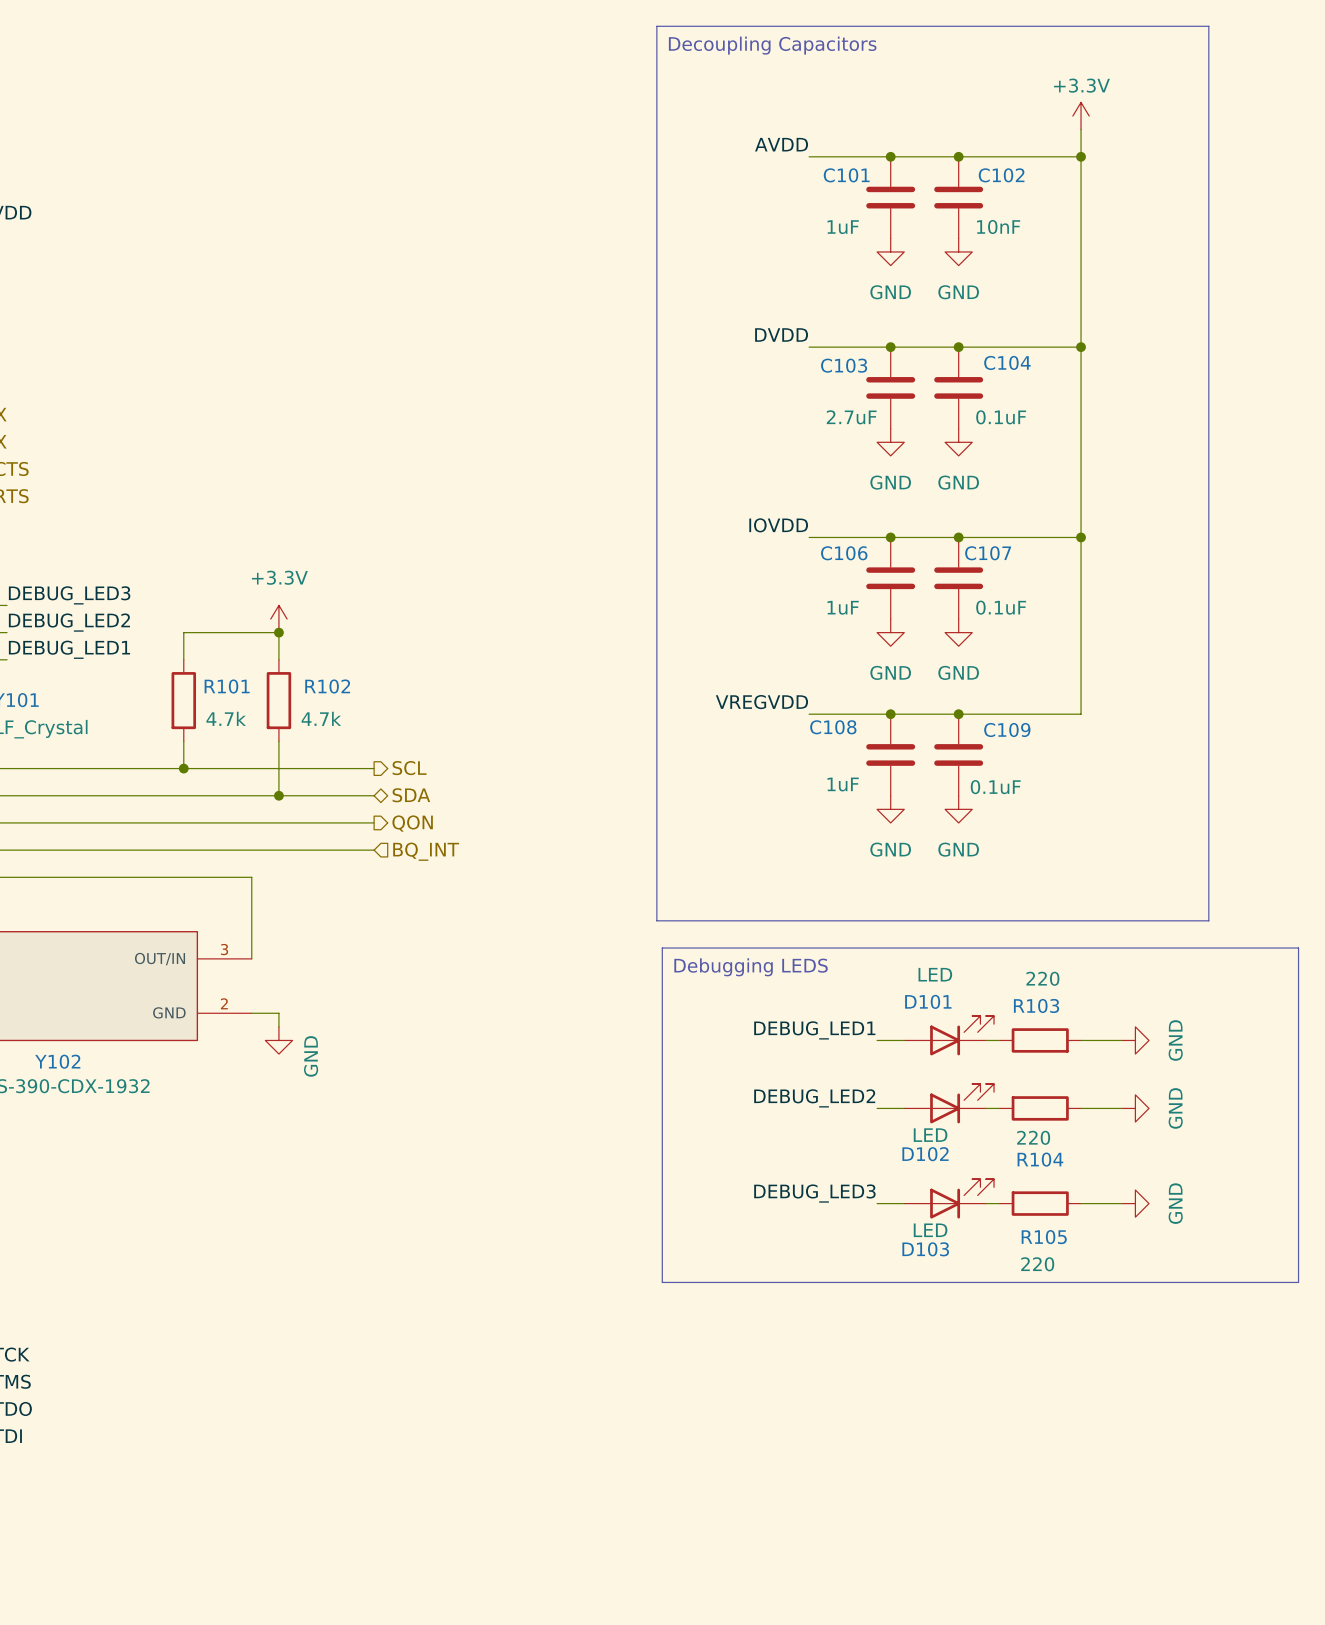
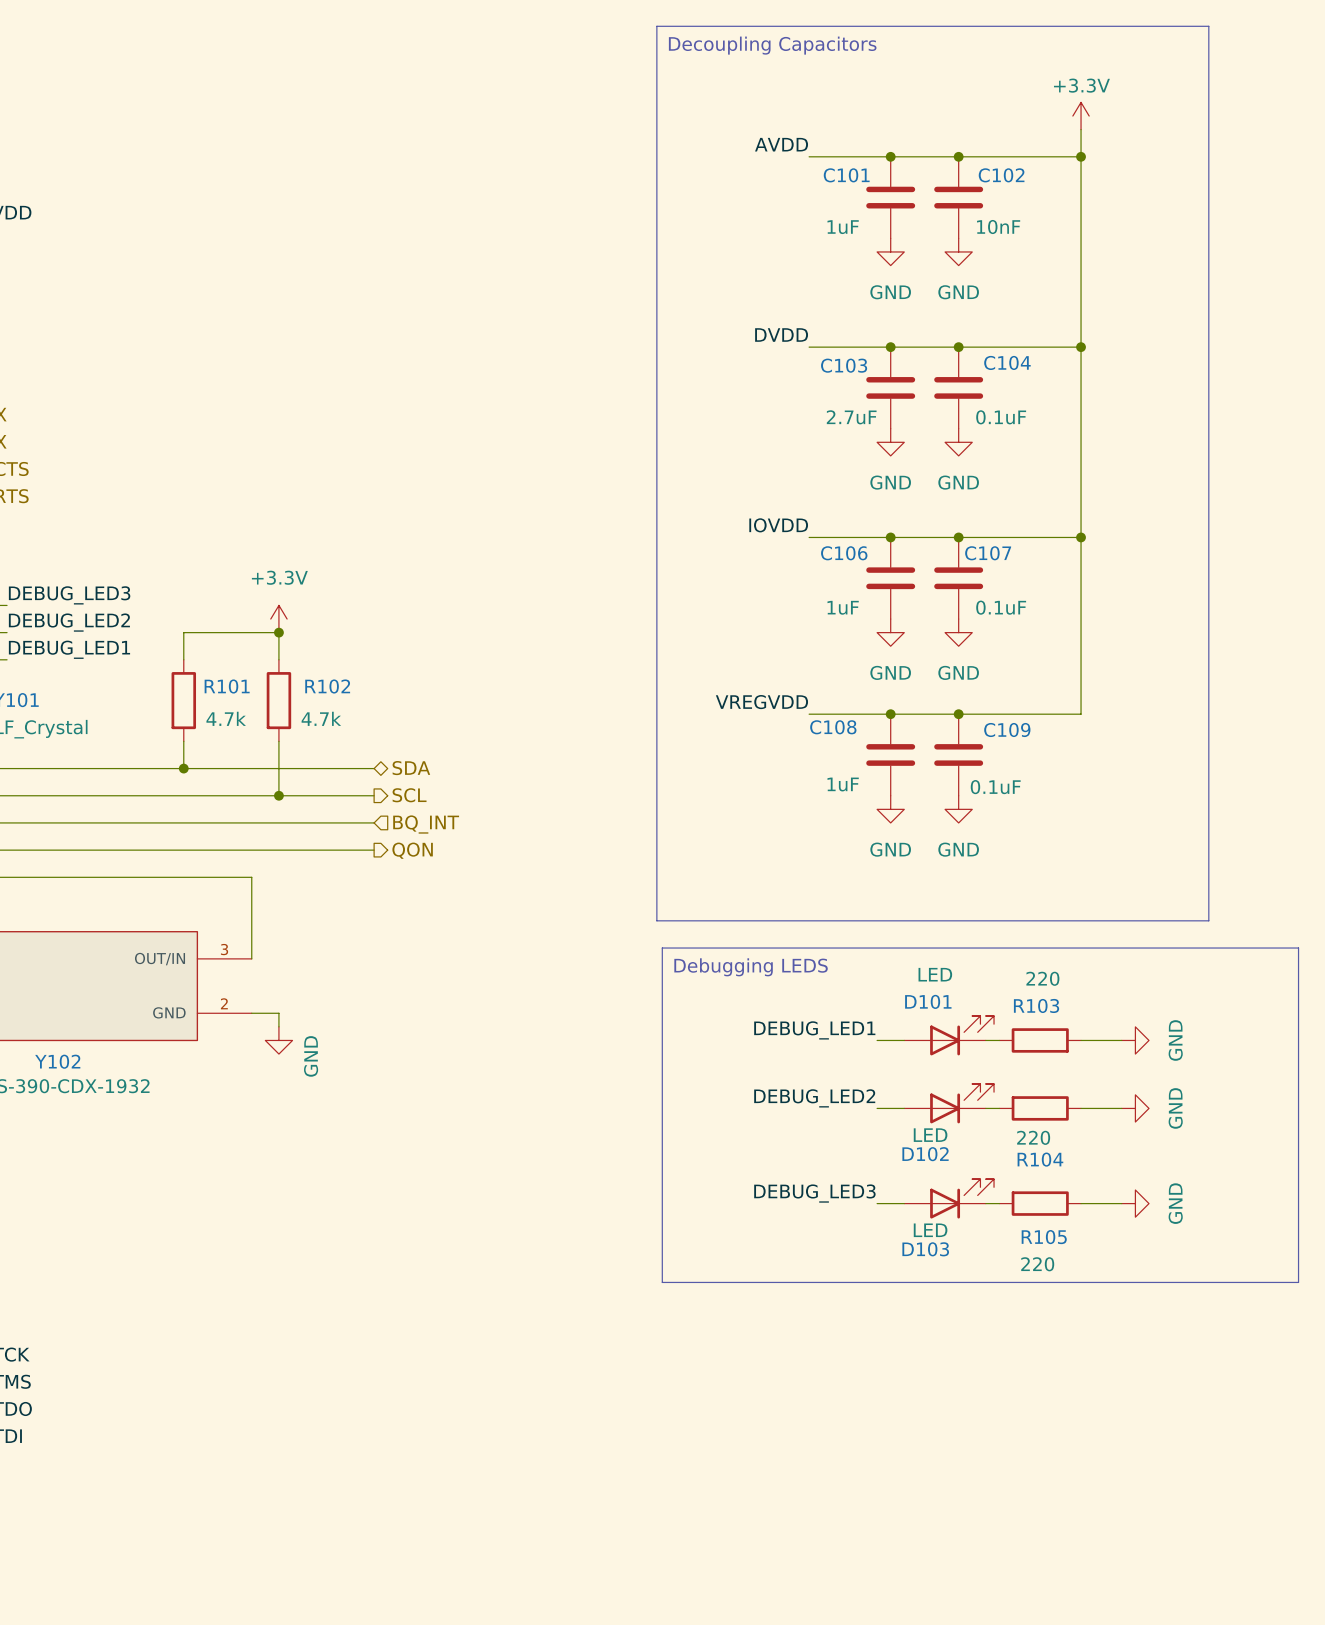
hierarchical label shape: output (409, 768) -> bidirectional (411, 768)
hierarchical label: SCL (409, 768) -> SDA (411, 768)
hierarchical label shape: bidirectional (411, 795) -> output (409, 795)
hierarchical label: SDA (411, 795) -> SCL (409, 795)
hierarchical label shape: output (412, 823) -> input (426, 824)
hierarchical label: QON (412, 823) -> BQ_INT (426, 824)
hierarchical label shape: input (426, 851) -> output (412, 850)
hierarchical label: BQ_INT (426, 851) -> QON (412, 850)

